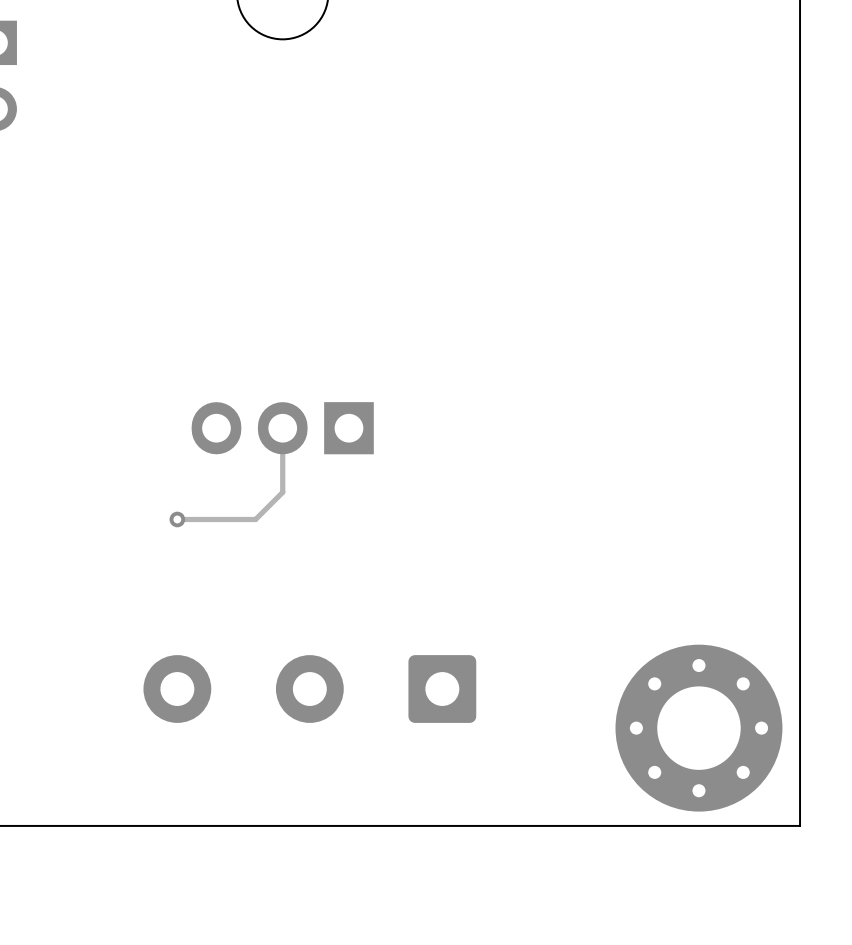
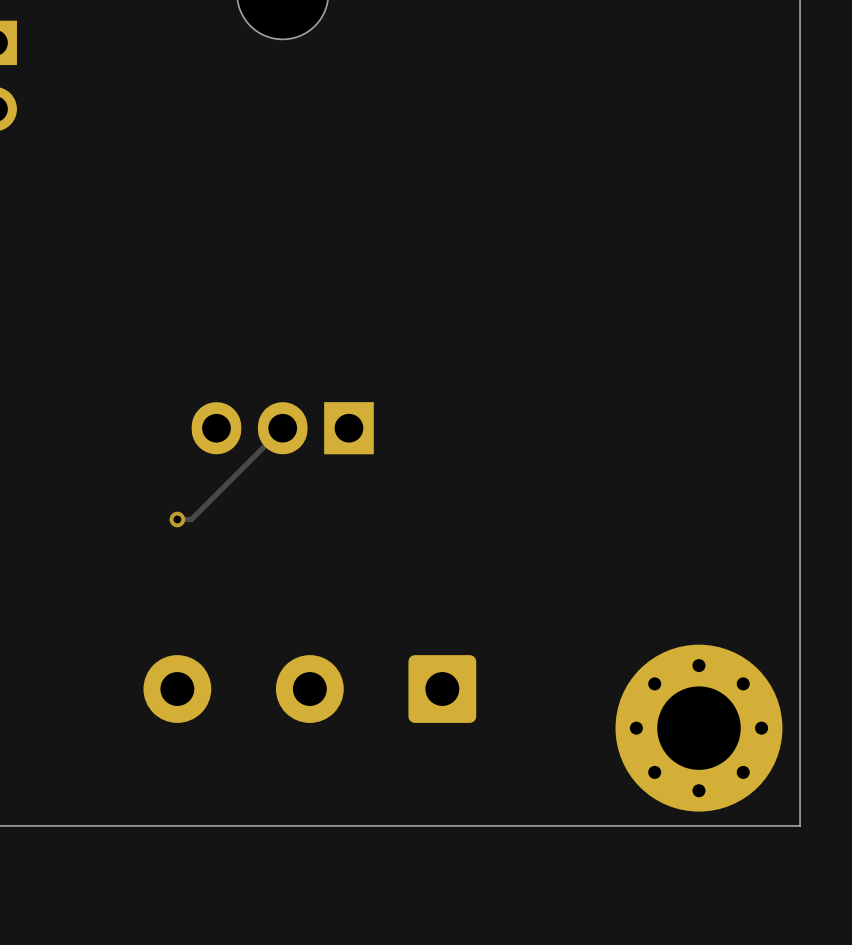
track: (282, 428) (282, 492) (255, 519) (191, 519) -> (282, 428) (191, 519)

